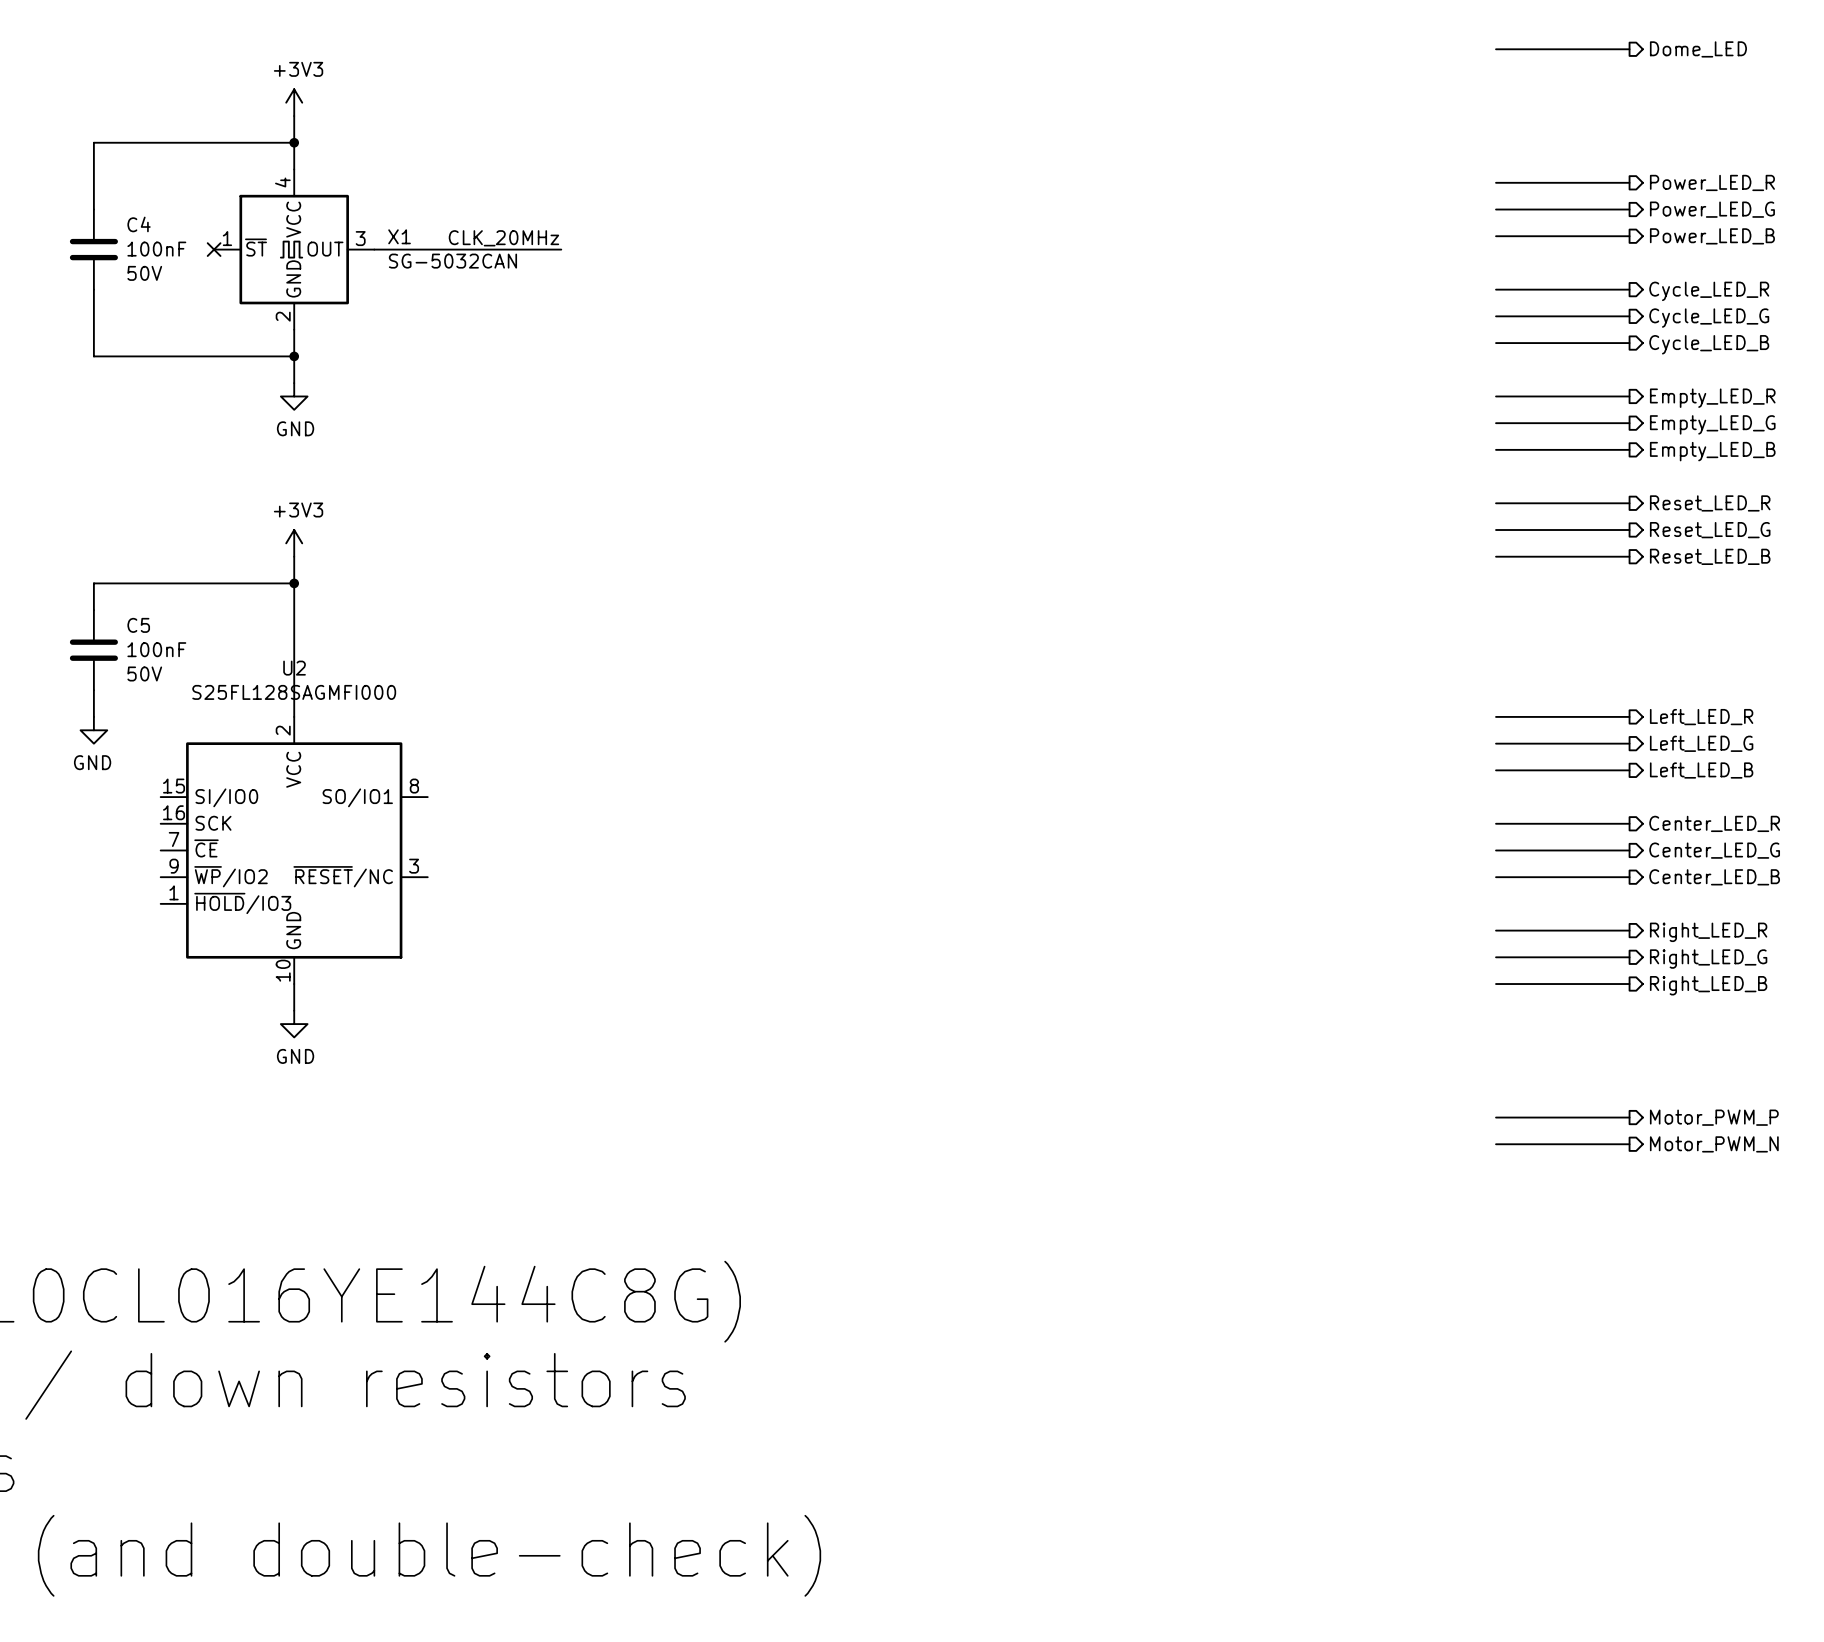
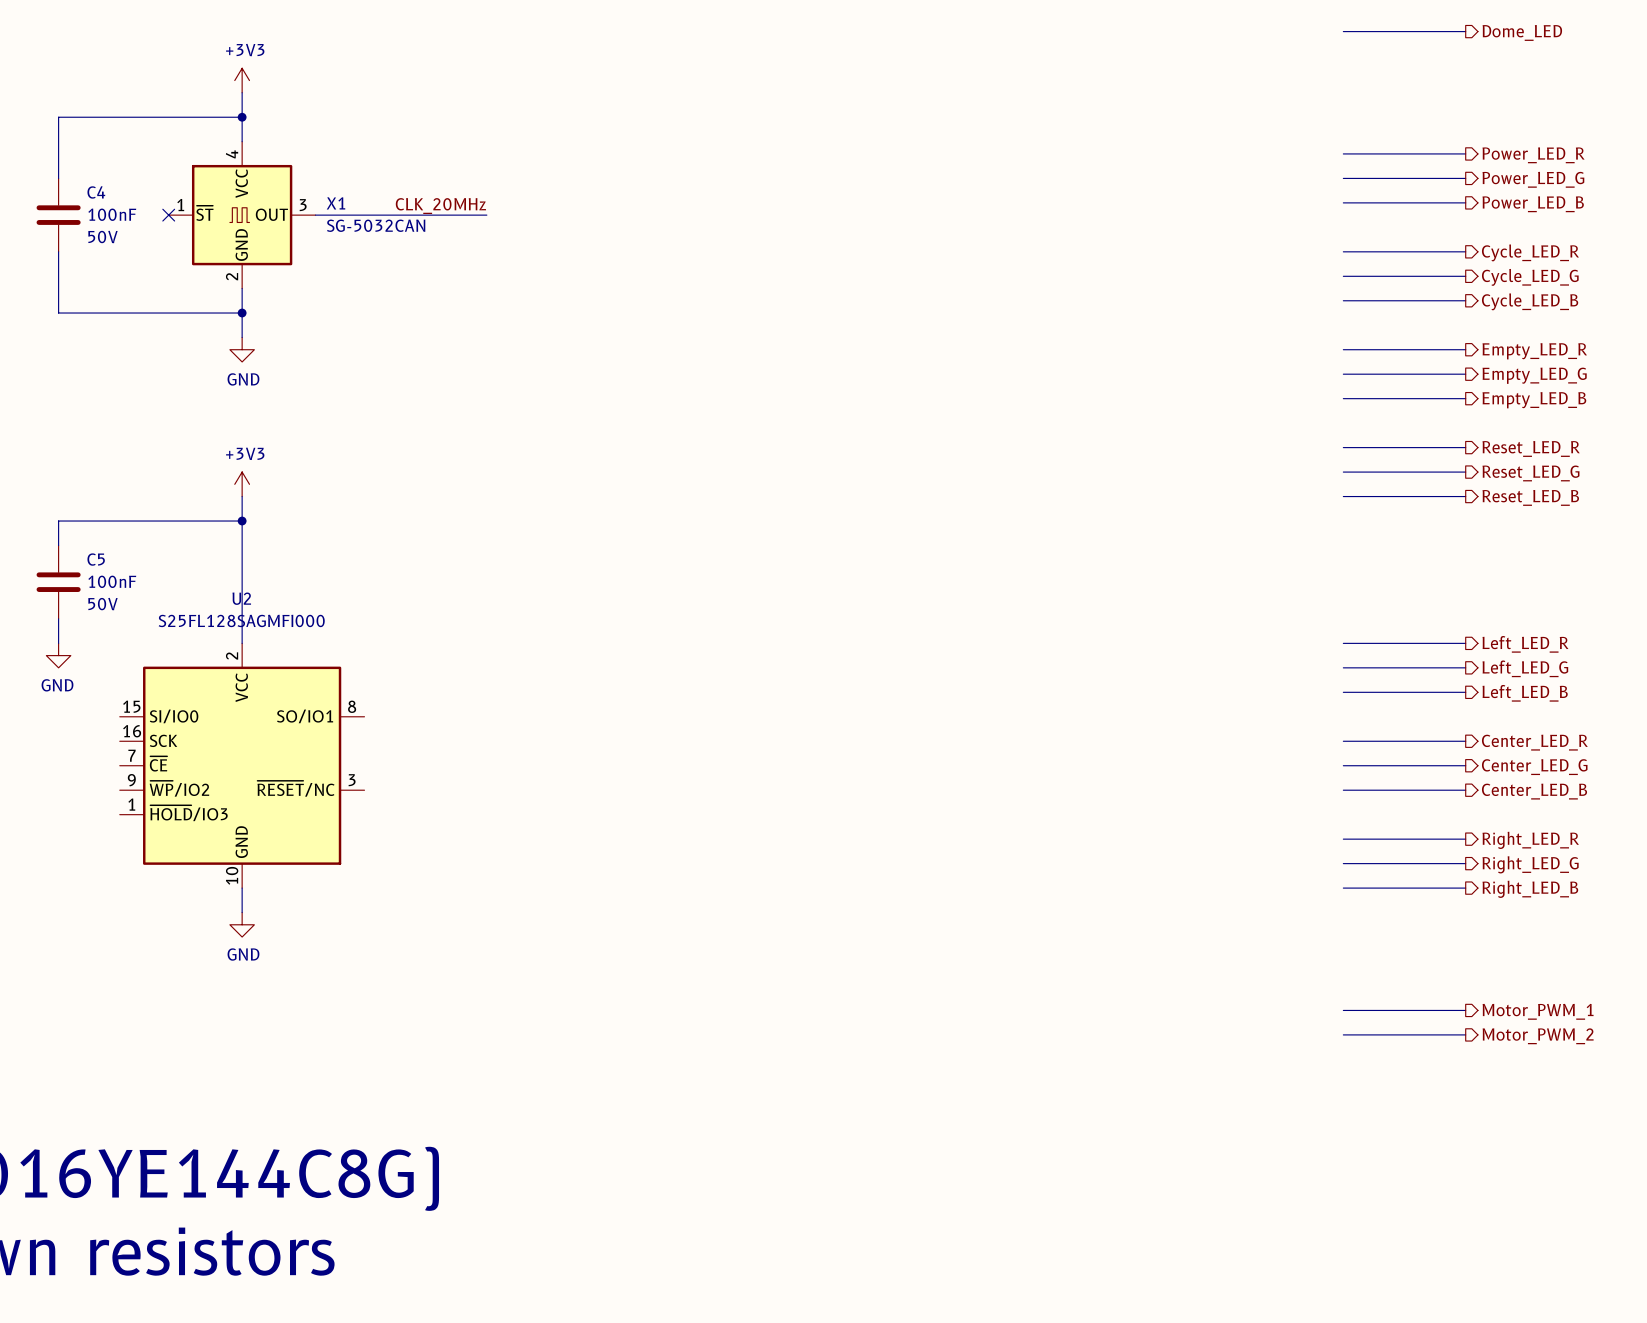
hierarchical label: Motor_PWM_P (1714, 1117) -> Motor_PWM_1 (1538, 1011)
hierarchical label: Motor_PWM_N (1714, 1144) -> Motor_PWM_2 (1538, 1036)

